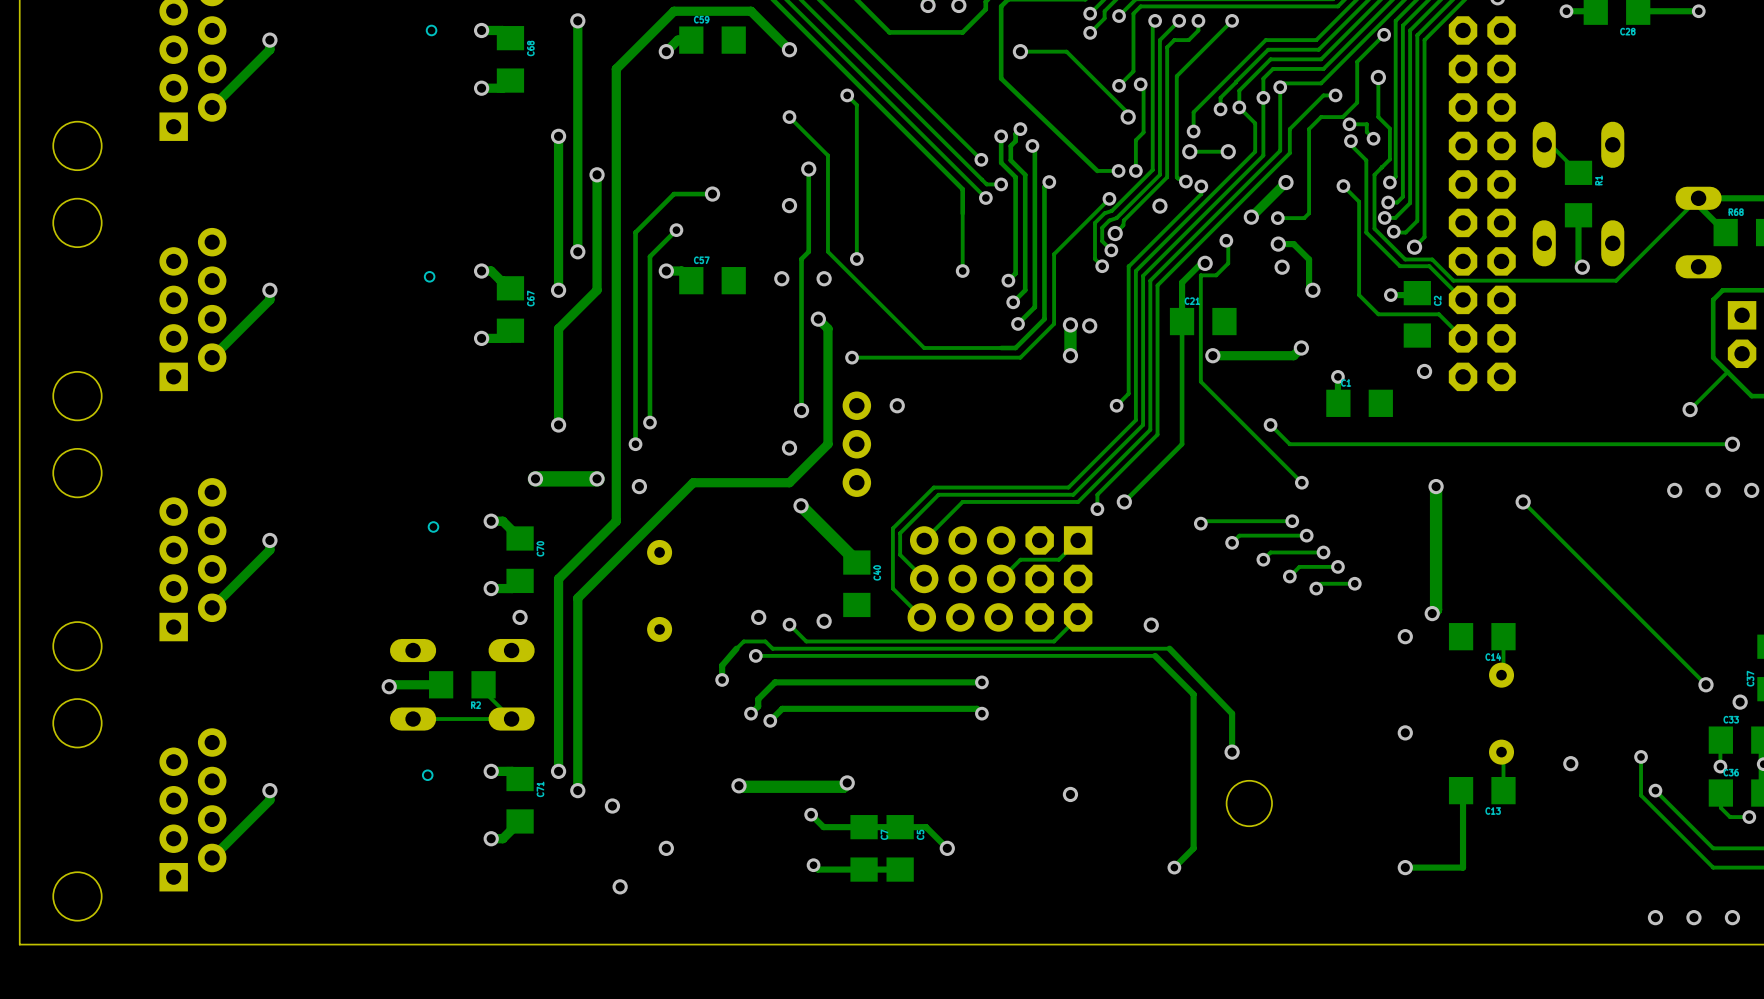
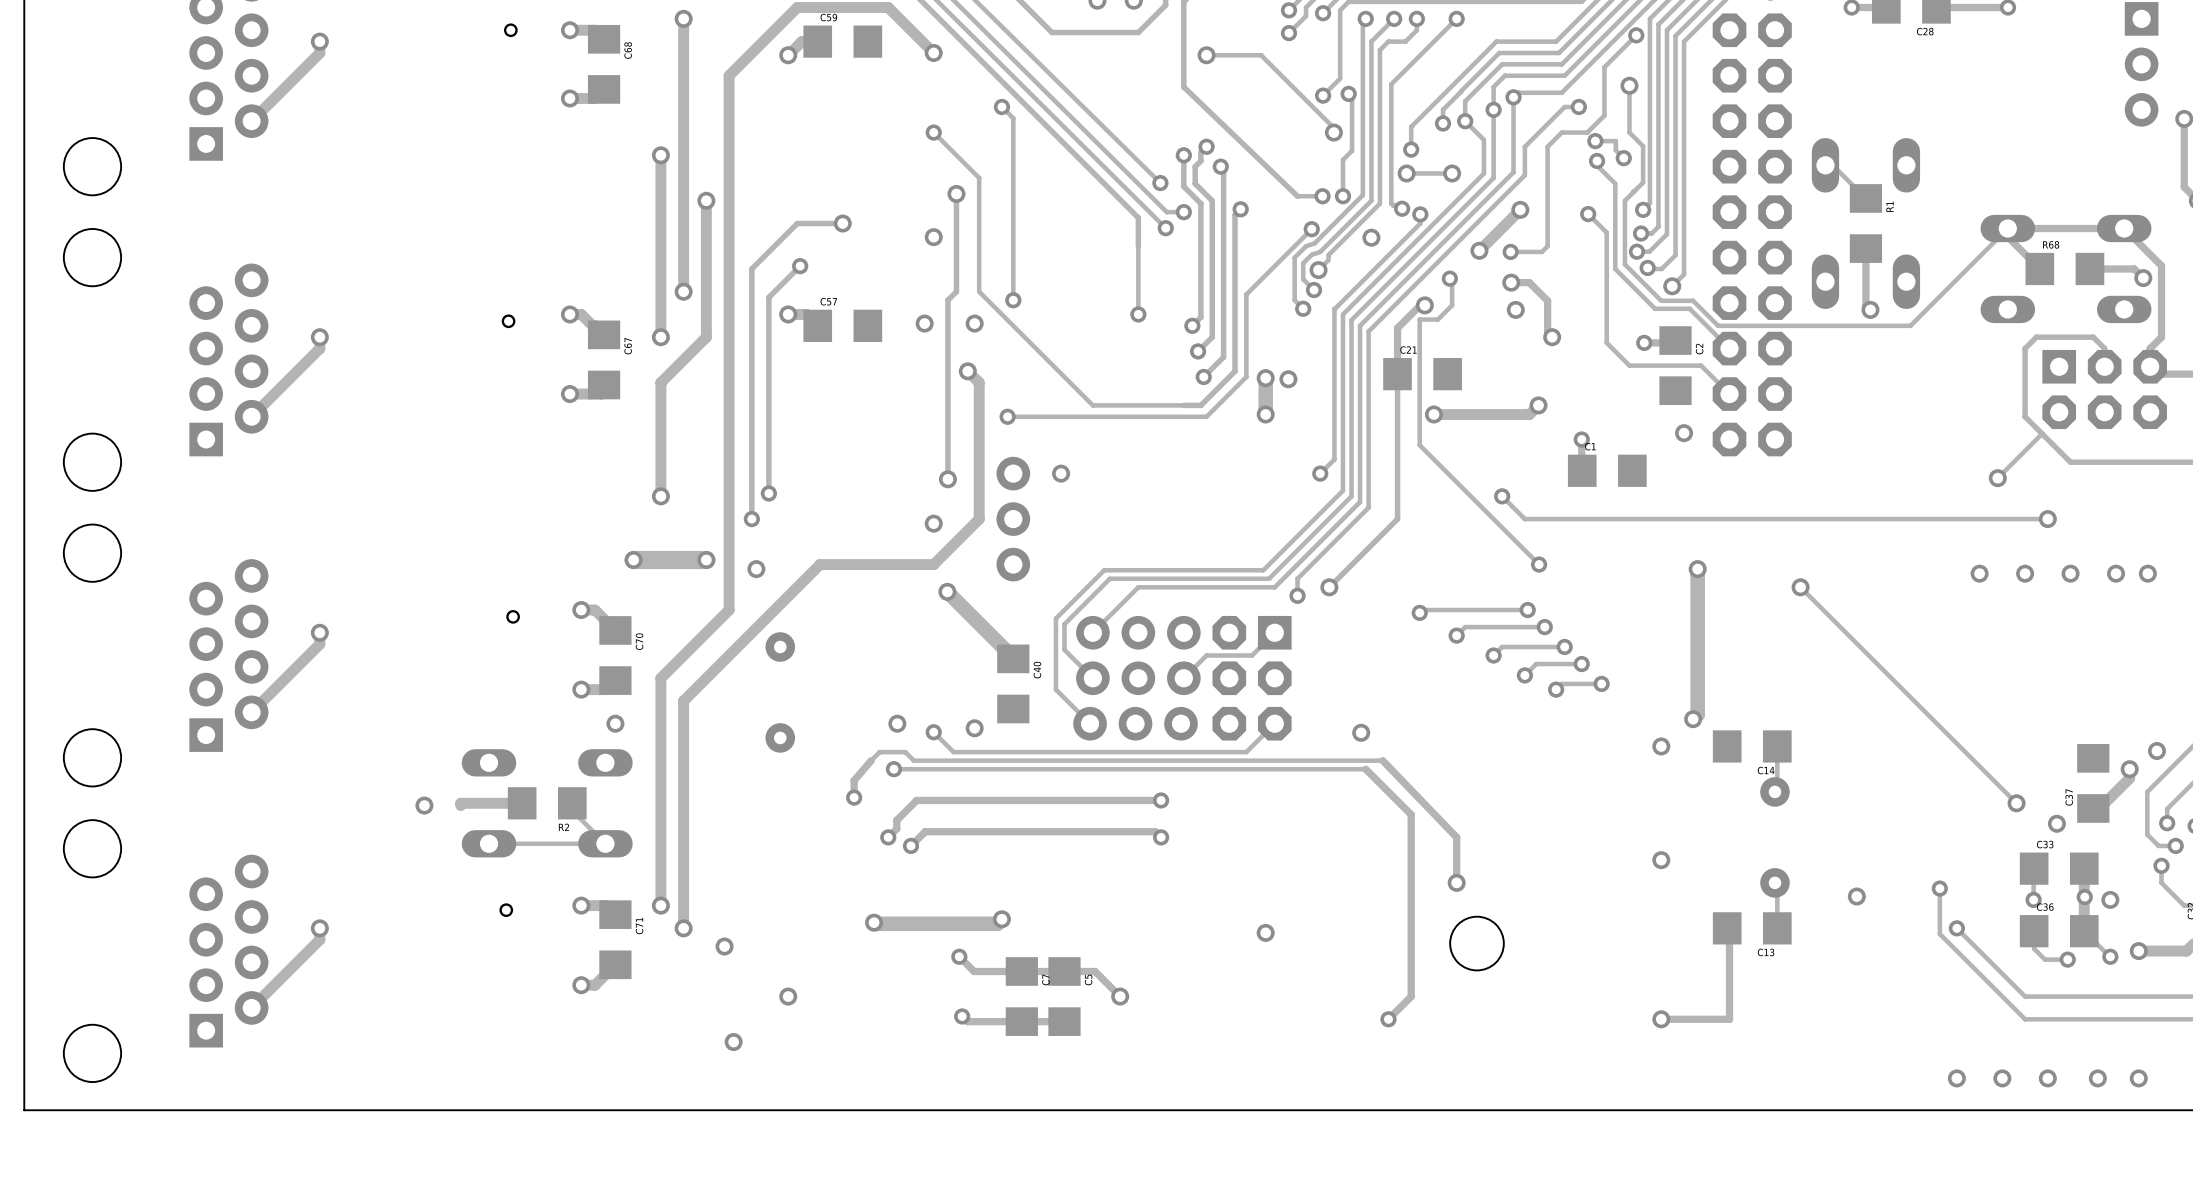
via position: (389, 686) -> (424, 805)

